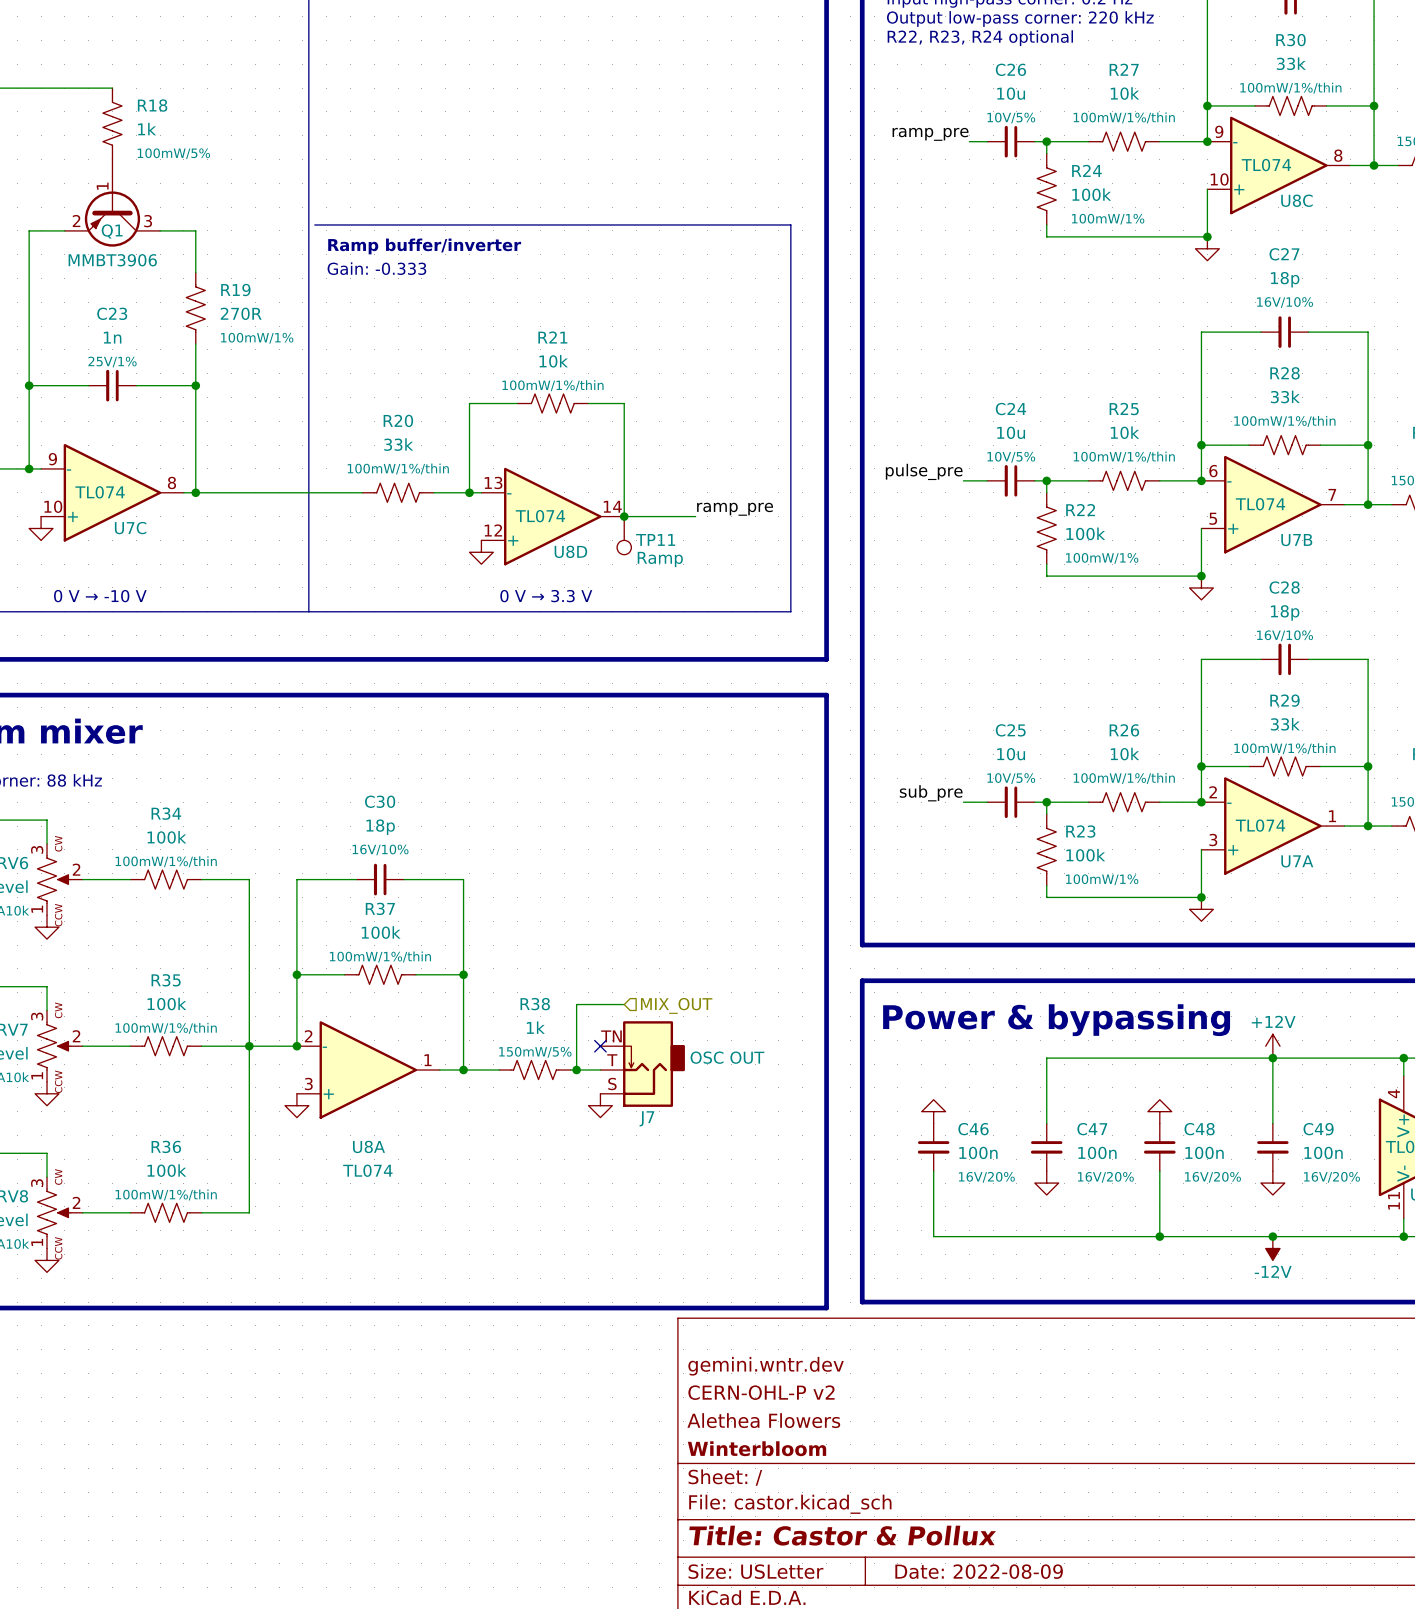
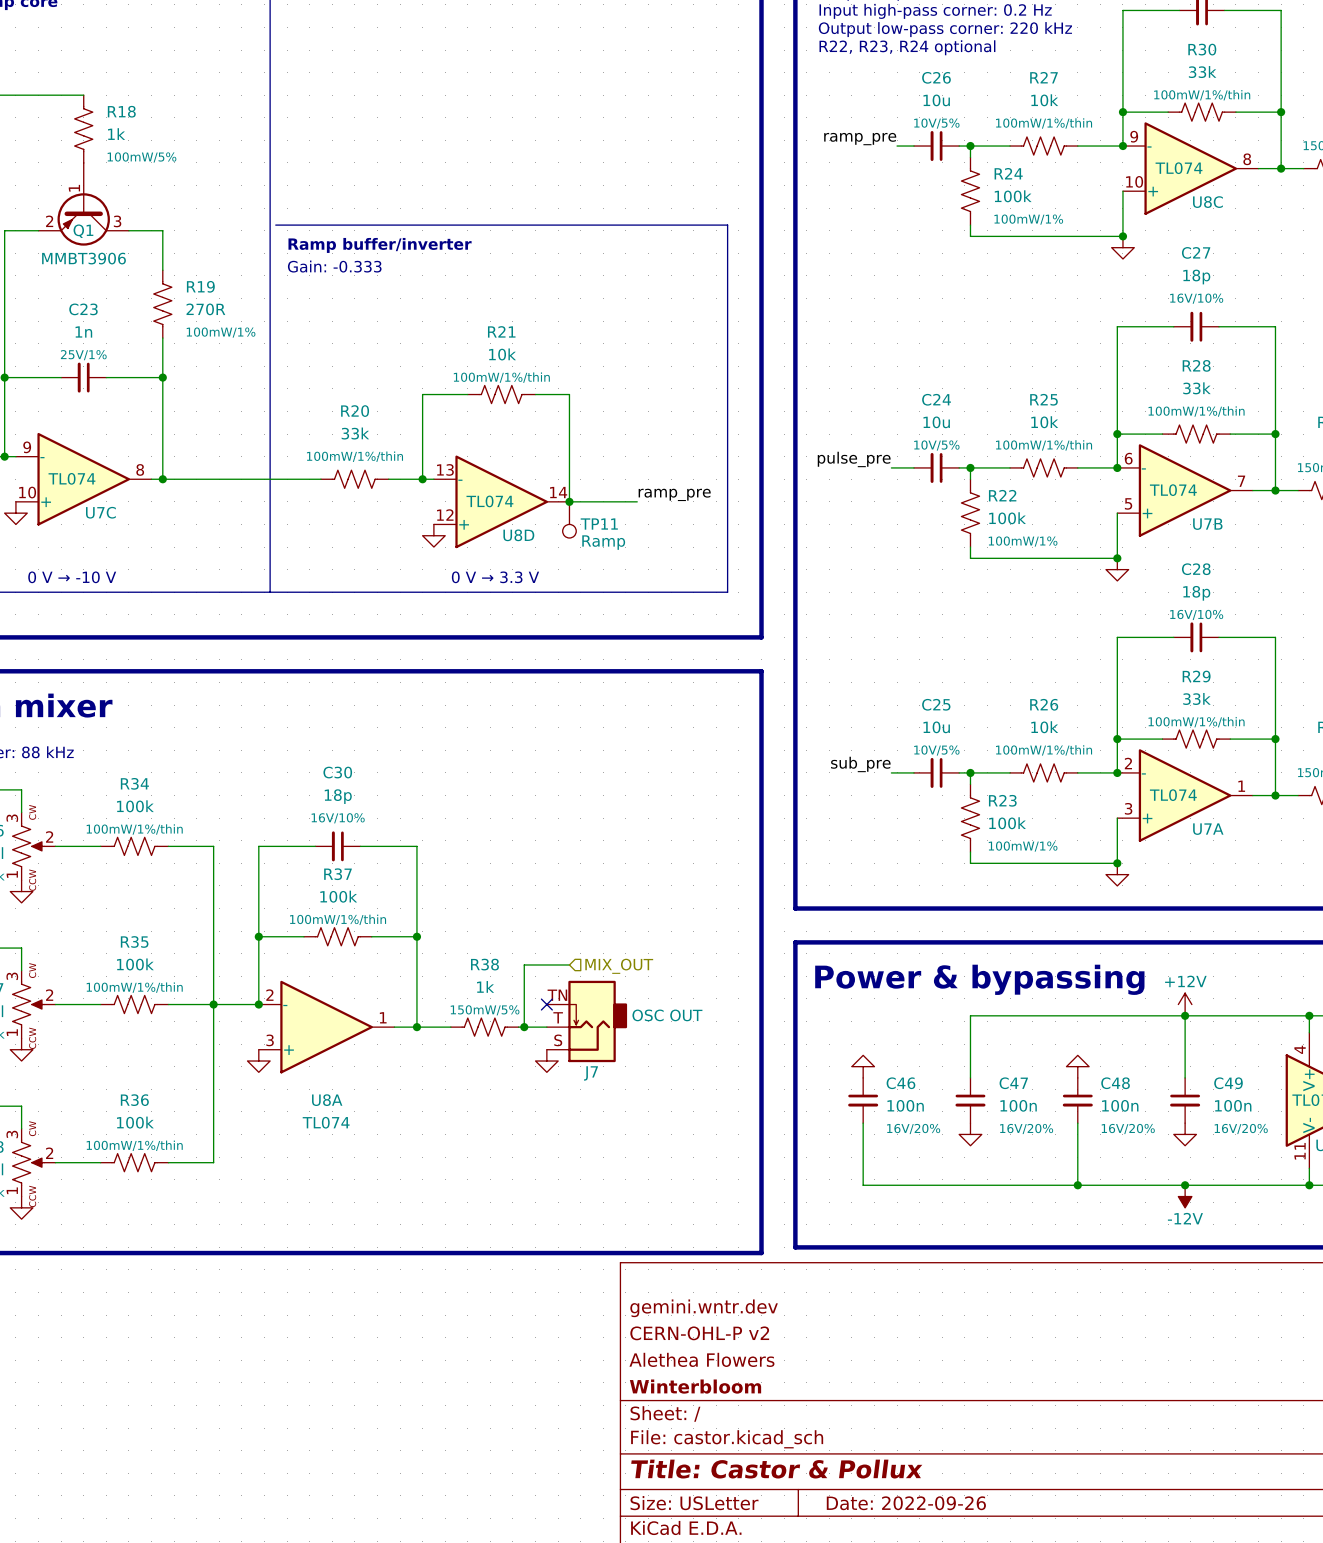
title block: Date: 2022-08-09 (979, 1571) -> Date: 2022-09-26 (906, 1503)

